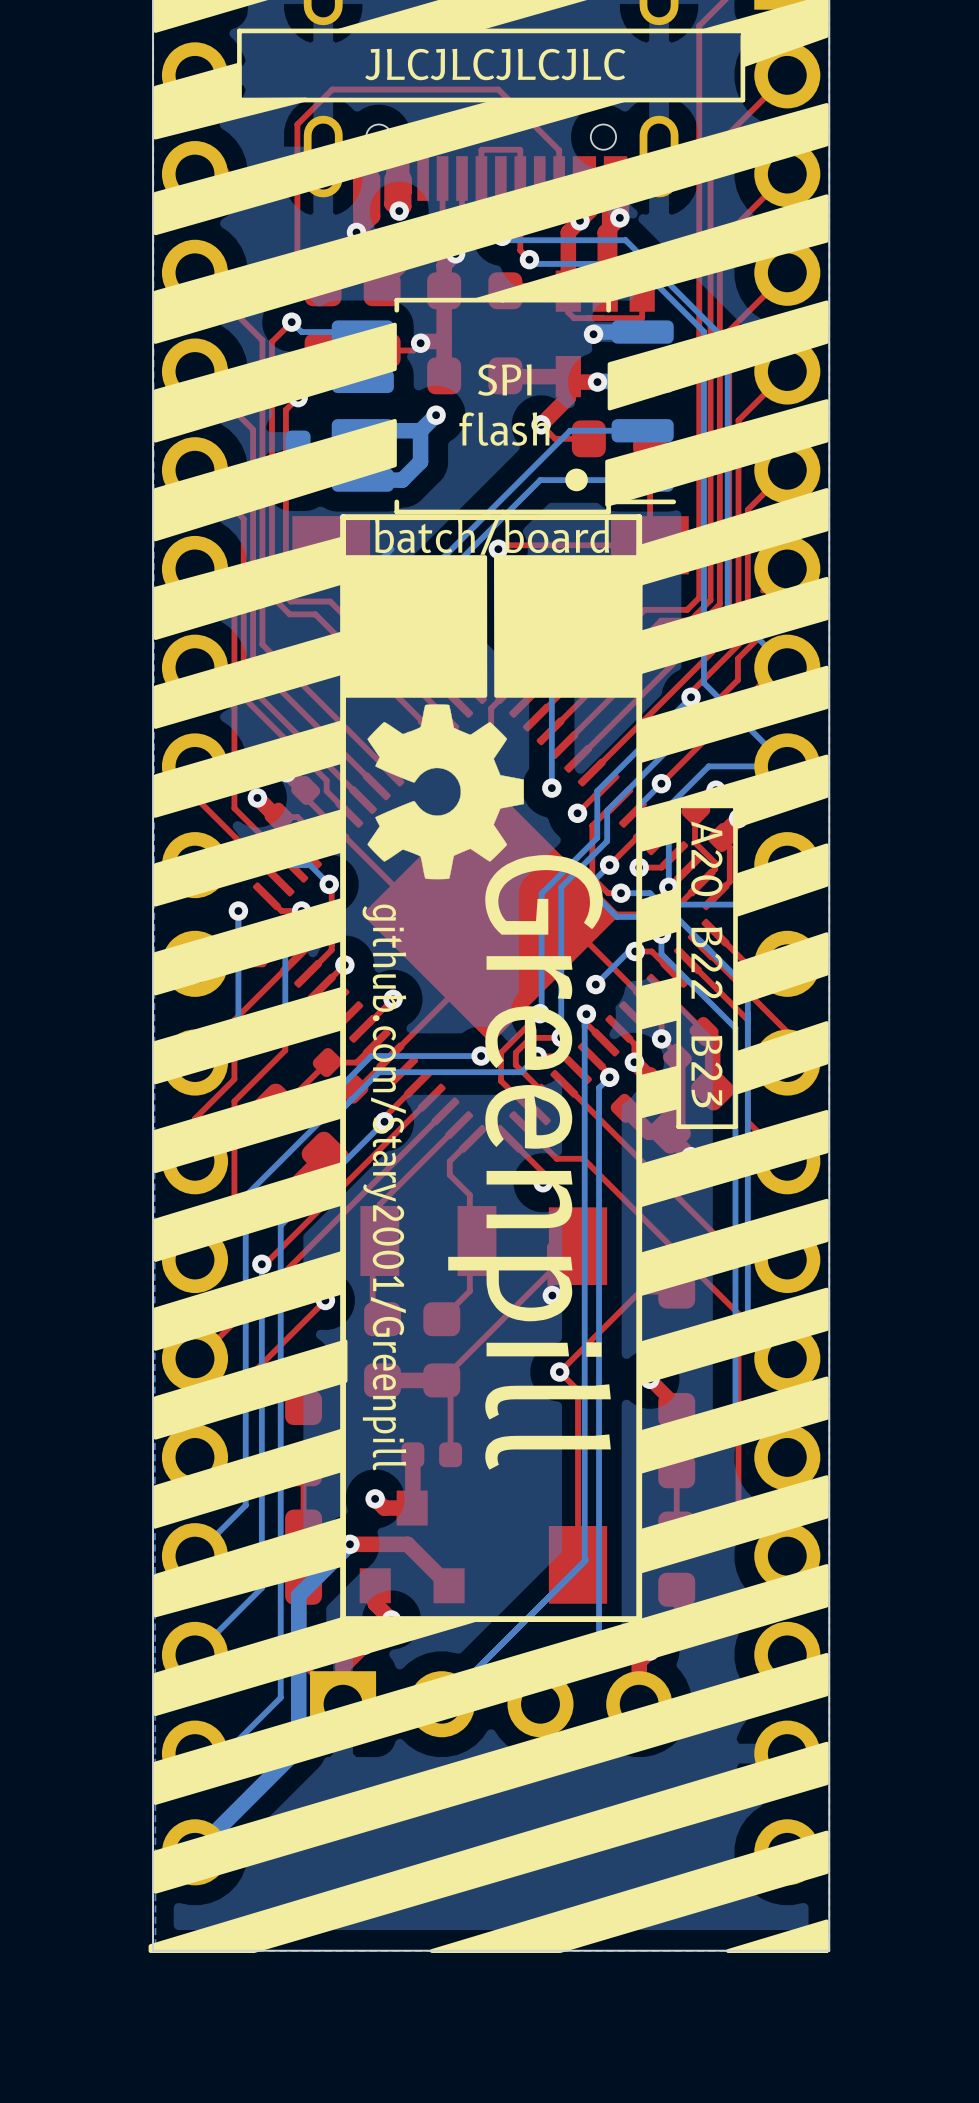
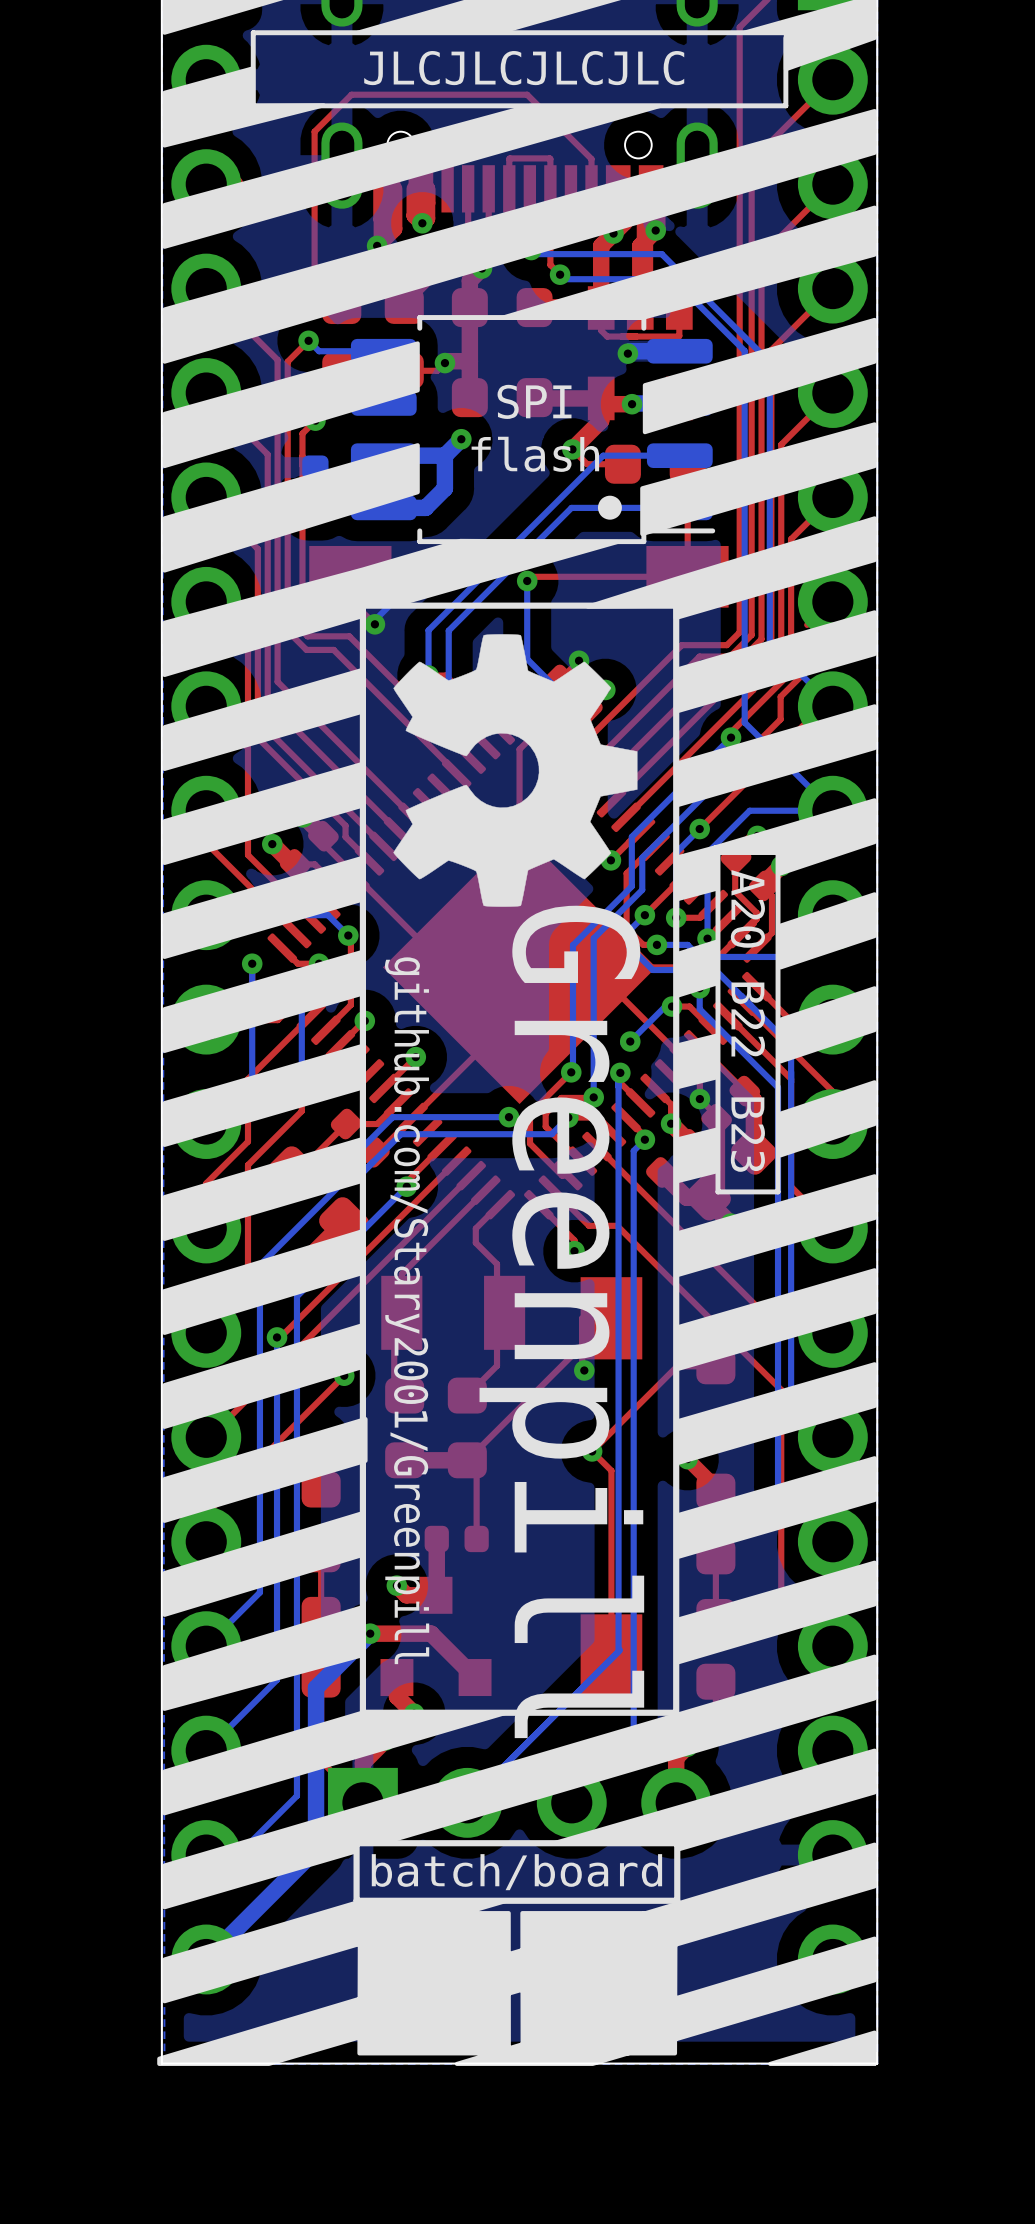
drawing: [153, 488, 829, 880] -> none
drawing: none -> [162, 516, 877, 907]
text: batch/board (492, 537) -> none
line: (639, 572) (639, 517) (343, 517) (343, 572) -> (676, 605) (362, 605)
drawing shape: [153, 1564, 829, 1805] -> [162, 1654, 877, 1910]
drawing: [153, 1652, 829, 1894] -> none
drawing: none -> [551, 1748, 877, 1852]
line: none -> (677, 1843) (677, 1900) (356, 1900) (356, 1843) (677, 1843)
text: none -> batch/board (516, 1872)
drawing: none -> [162, 1898, 678, 2056]

